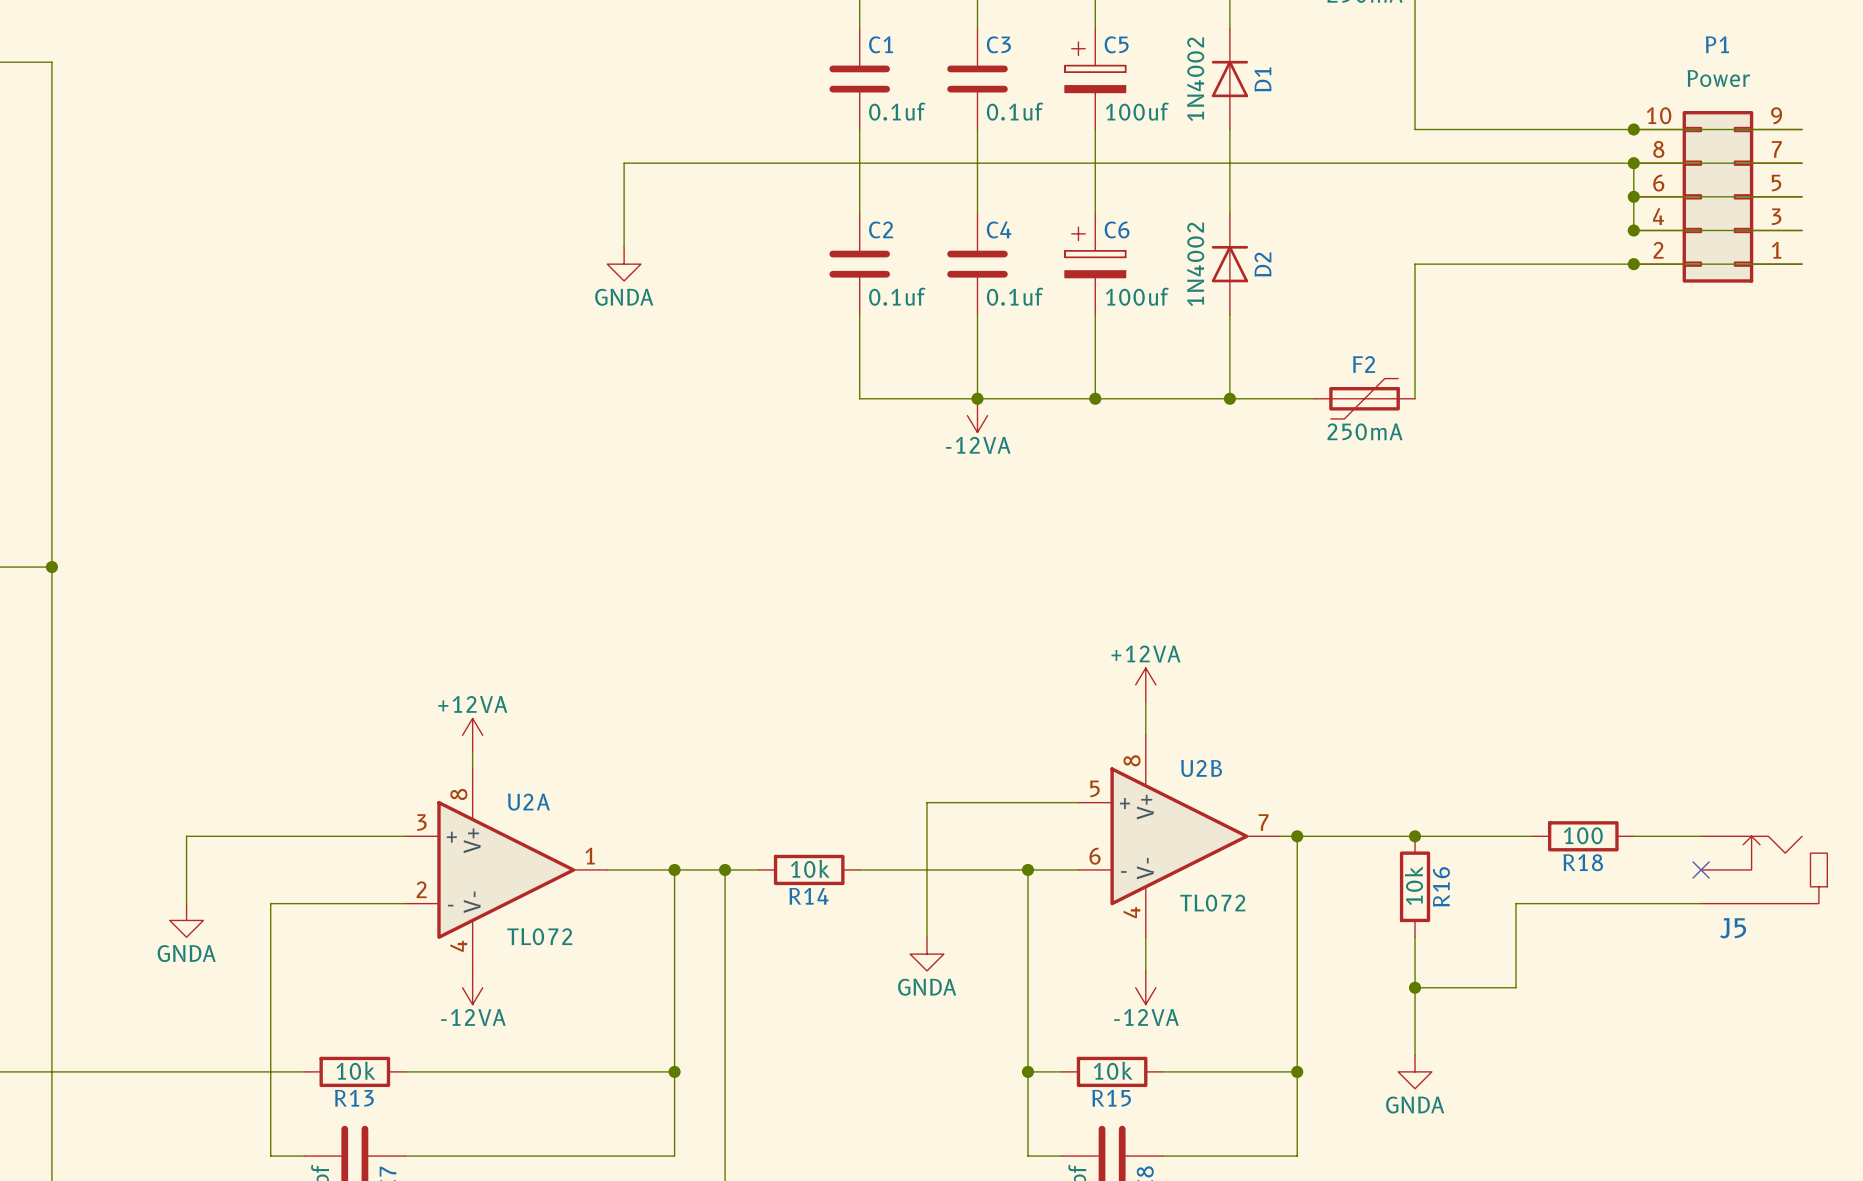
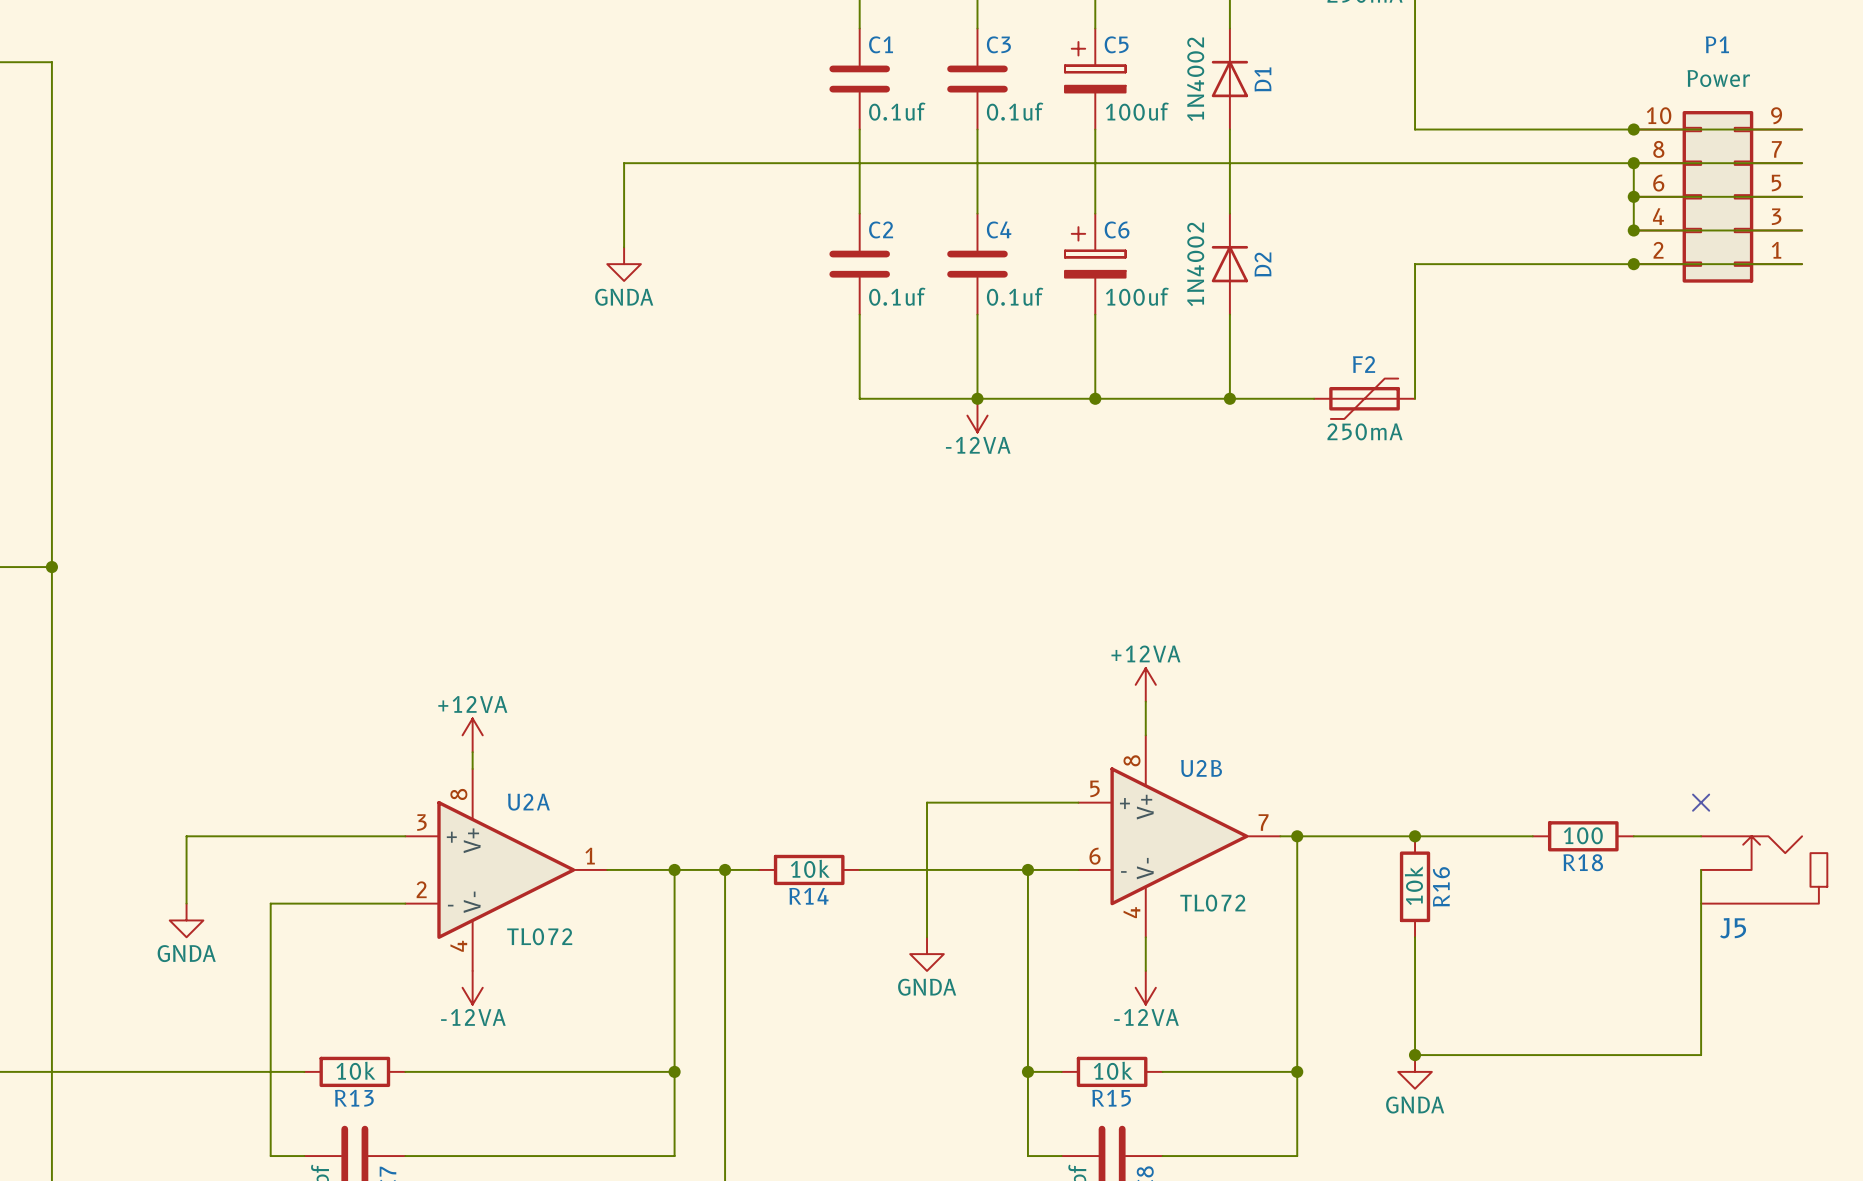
wire: none -> (1701, 869) (1701, 1055) (1415, 1055)
no-connect mark position: (1701, 869) -> (1701, 802)
wire: (1701, 903) (1515, 903) (1515, 987) (1415, 987) -> none
junction position: (1415, 987) -> (1415, 1055)

